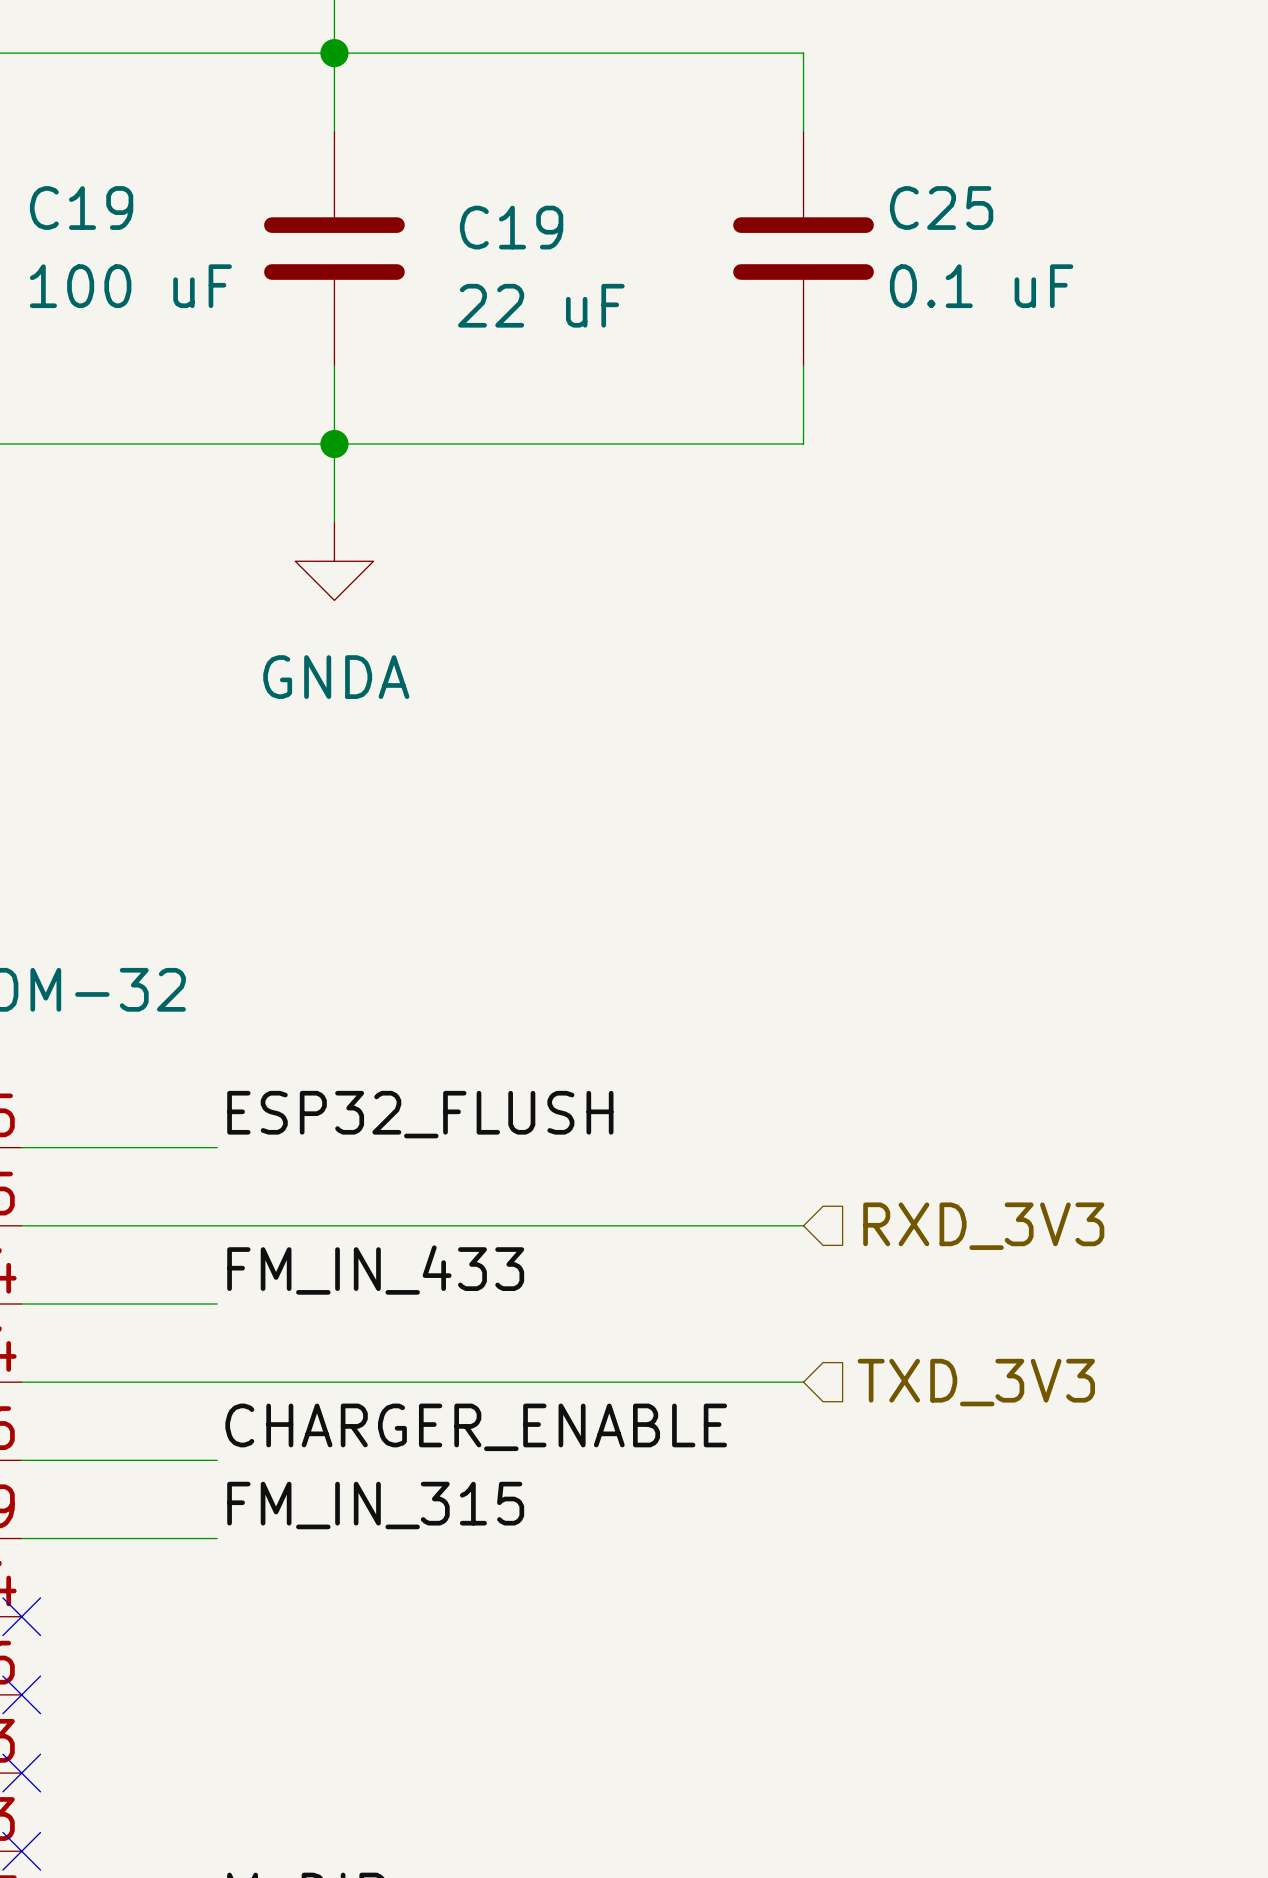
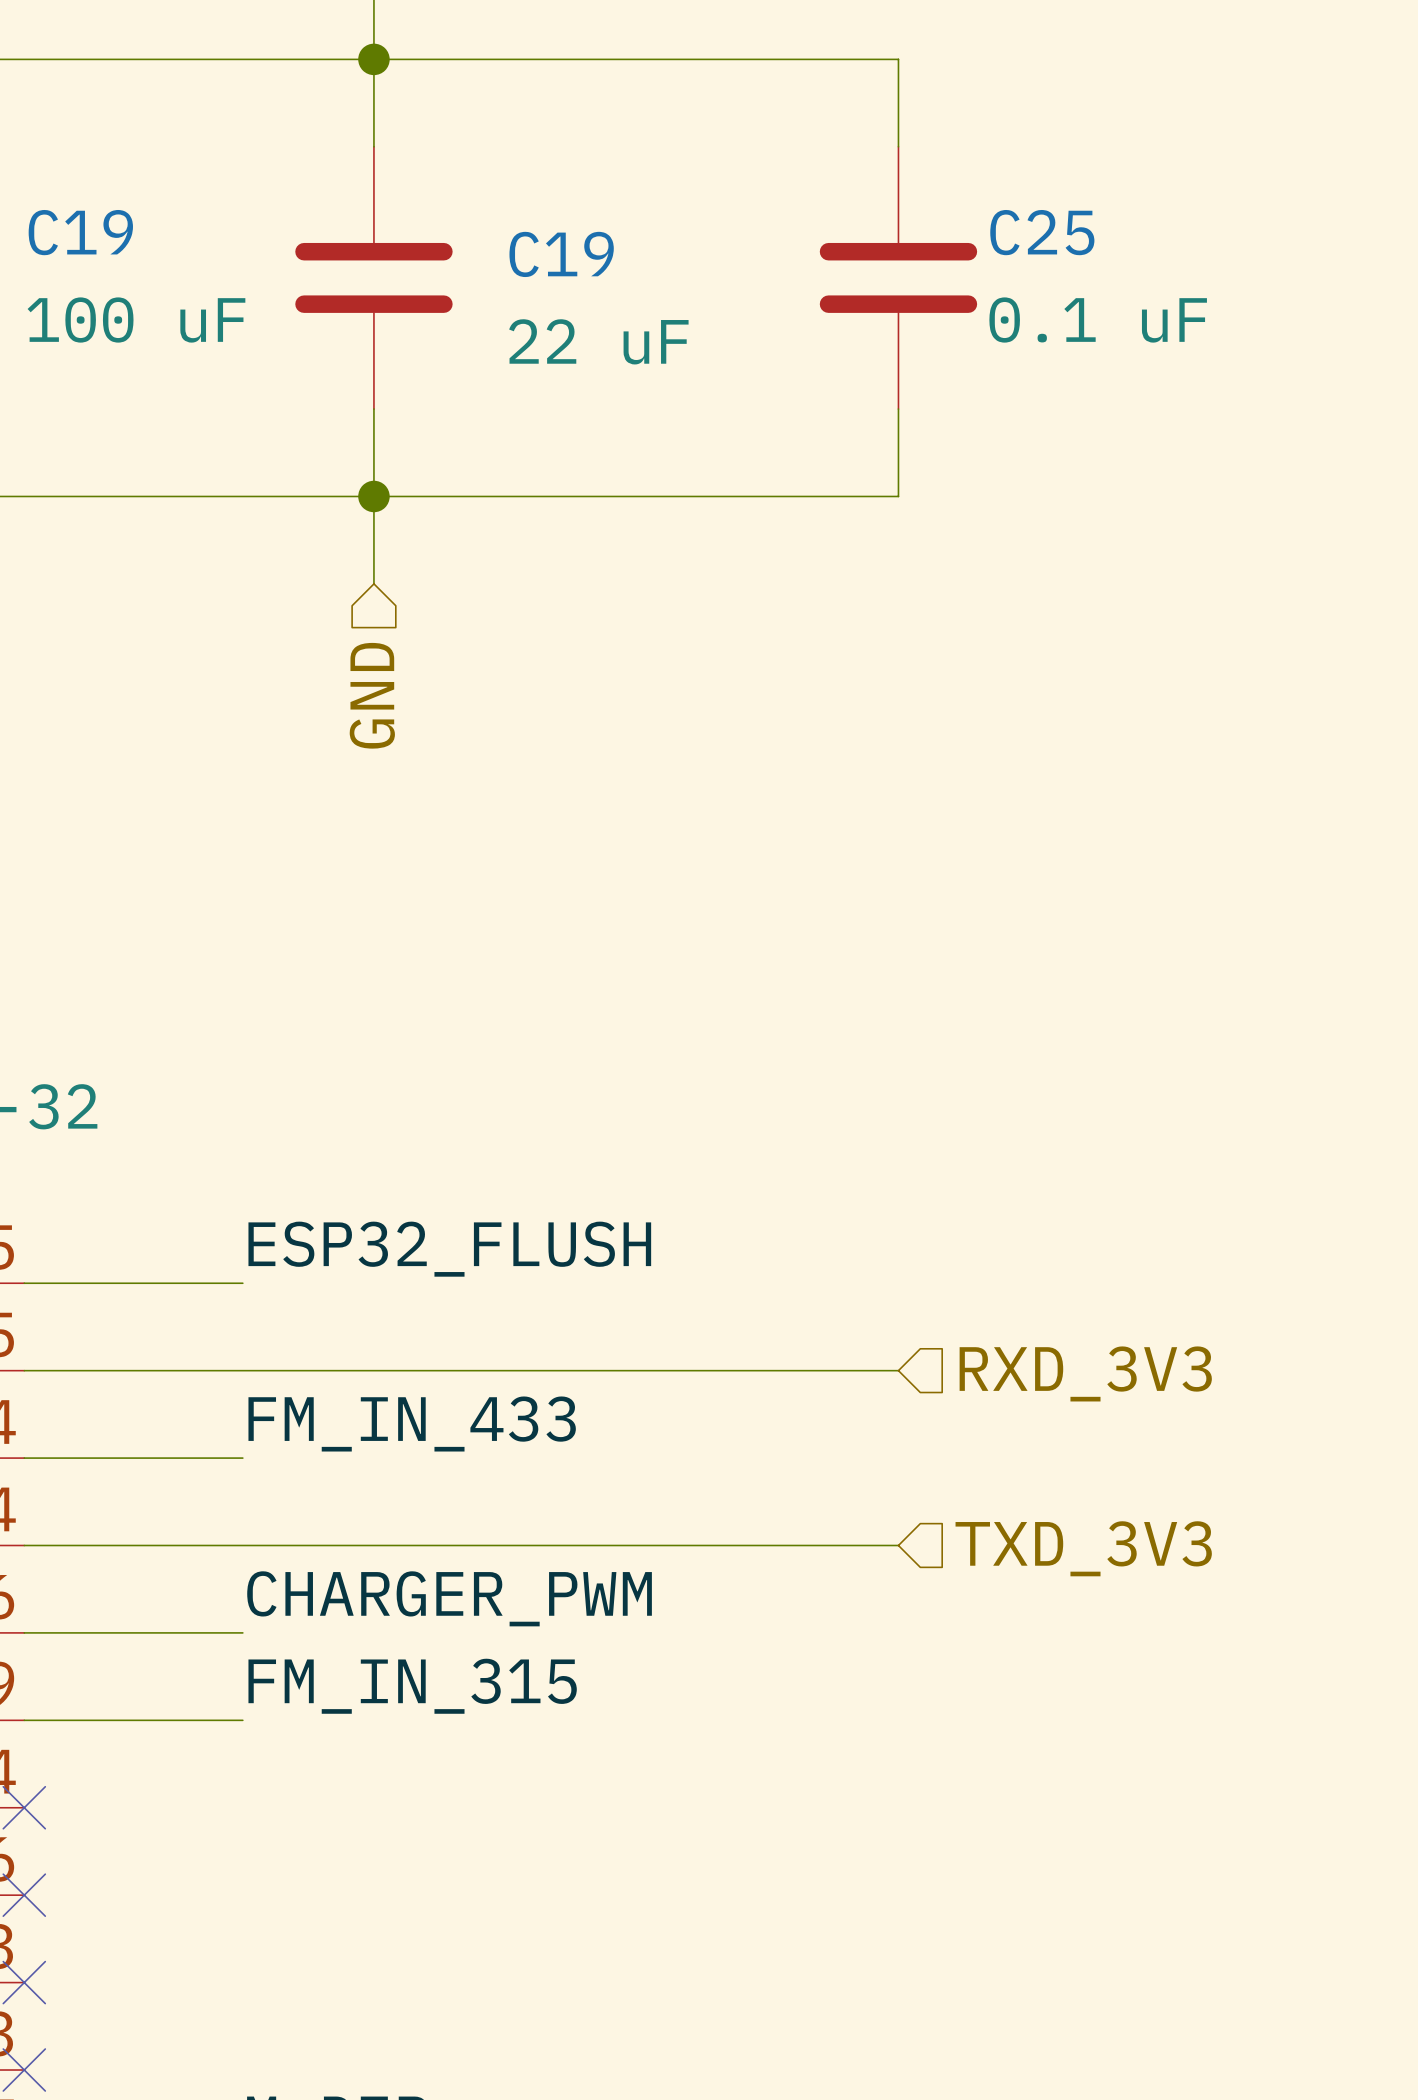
power symbol: GNDA (334, 561) -> none
hierarchical label: none -> GND (372, 695)
label: CHARGER_ENABLE (476, 1427) -> CHARGER_PWM (449, 1598)

